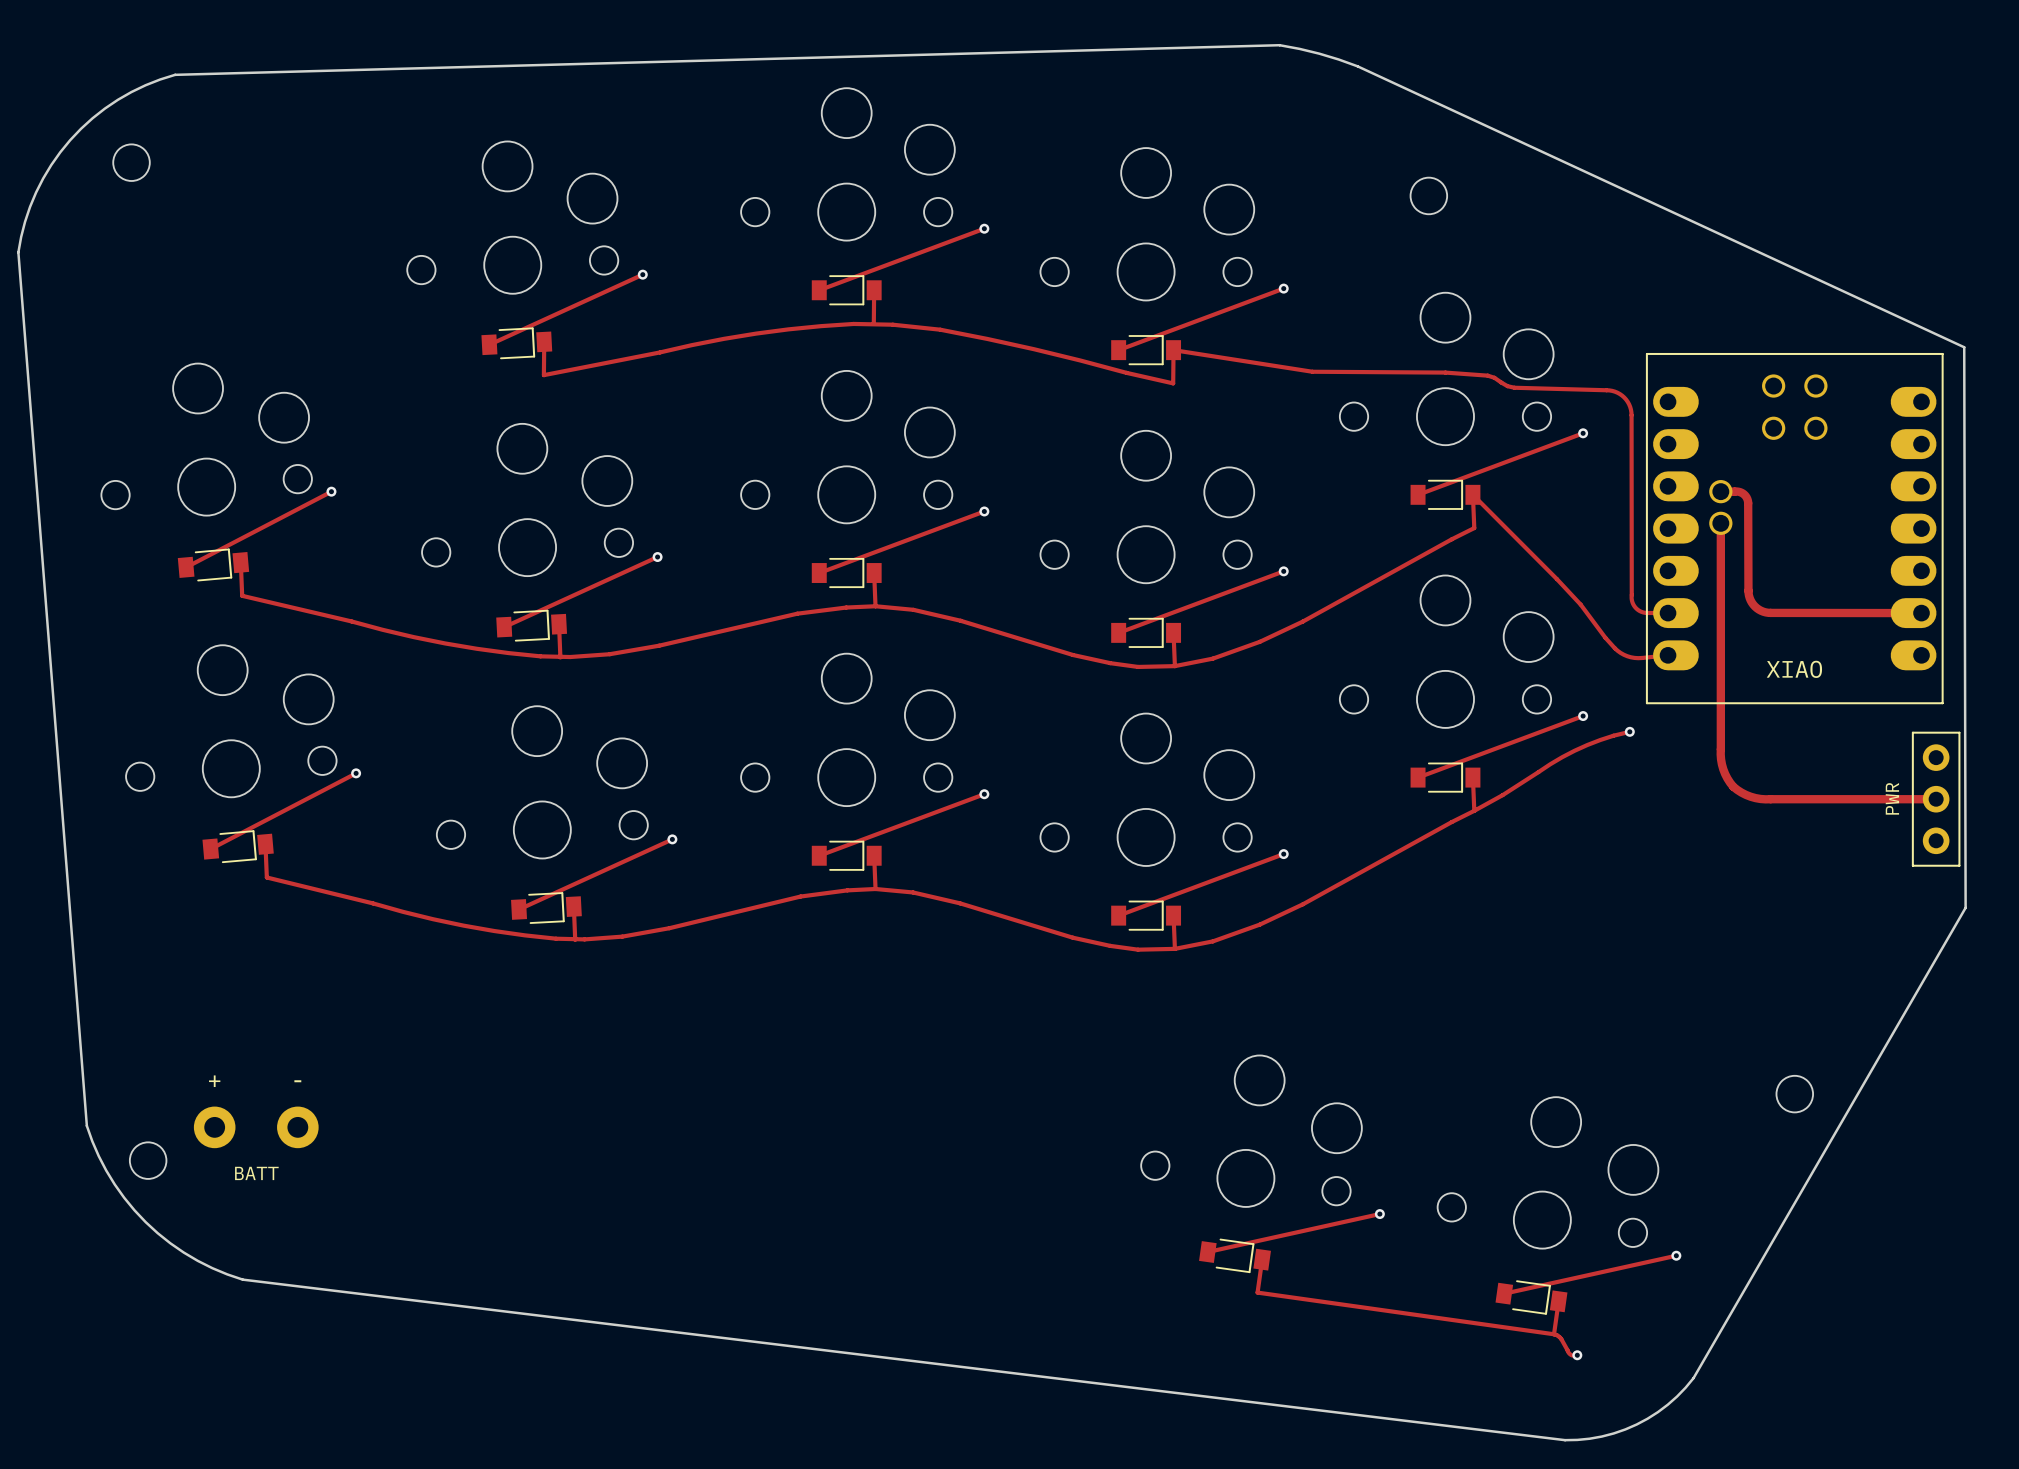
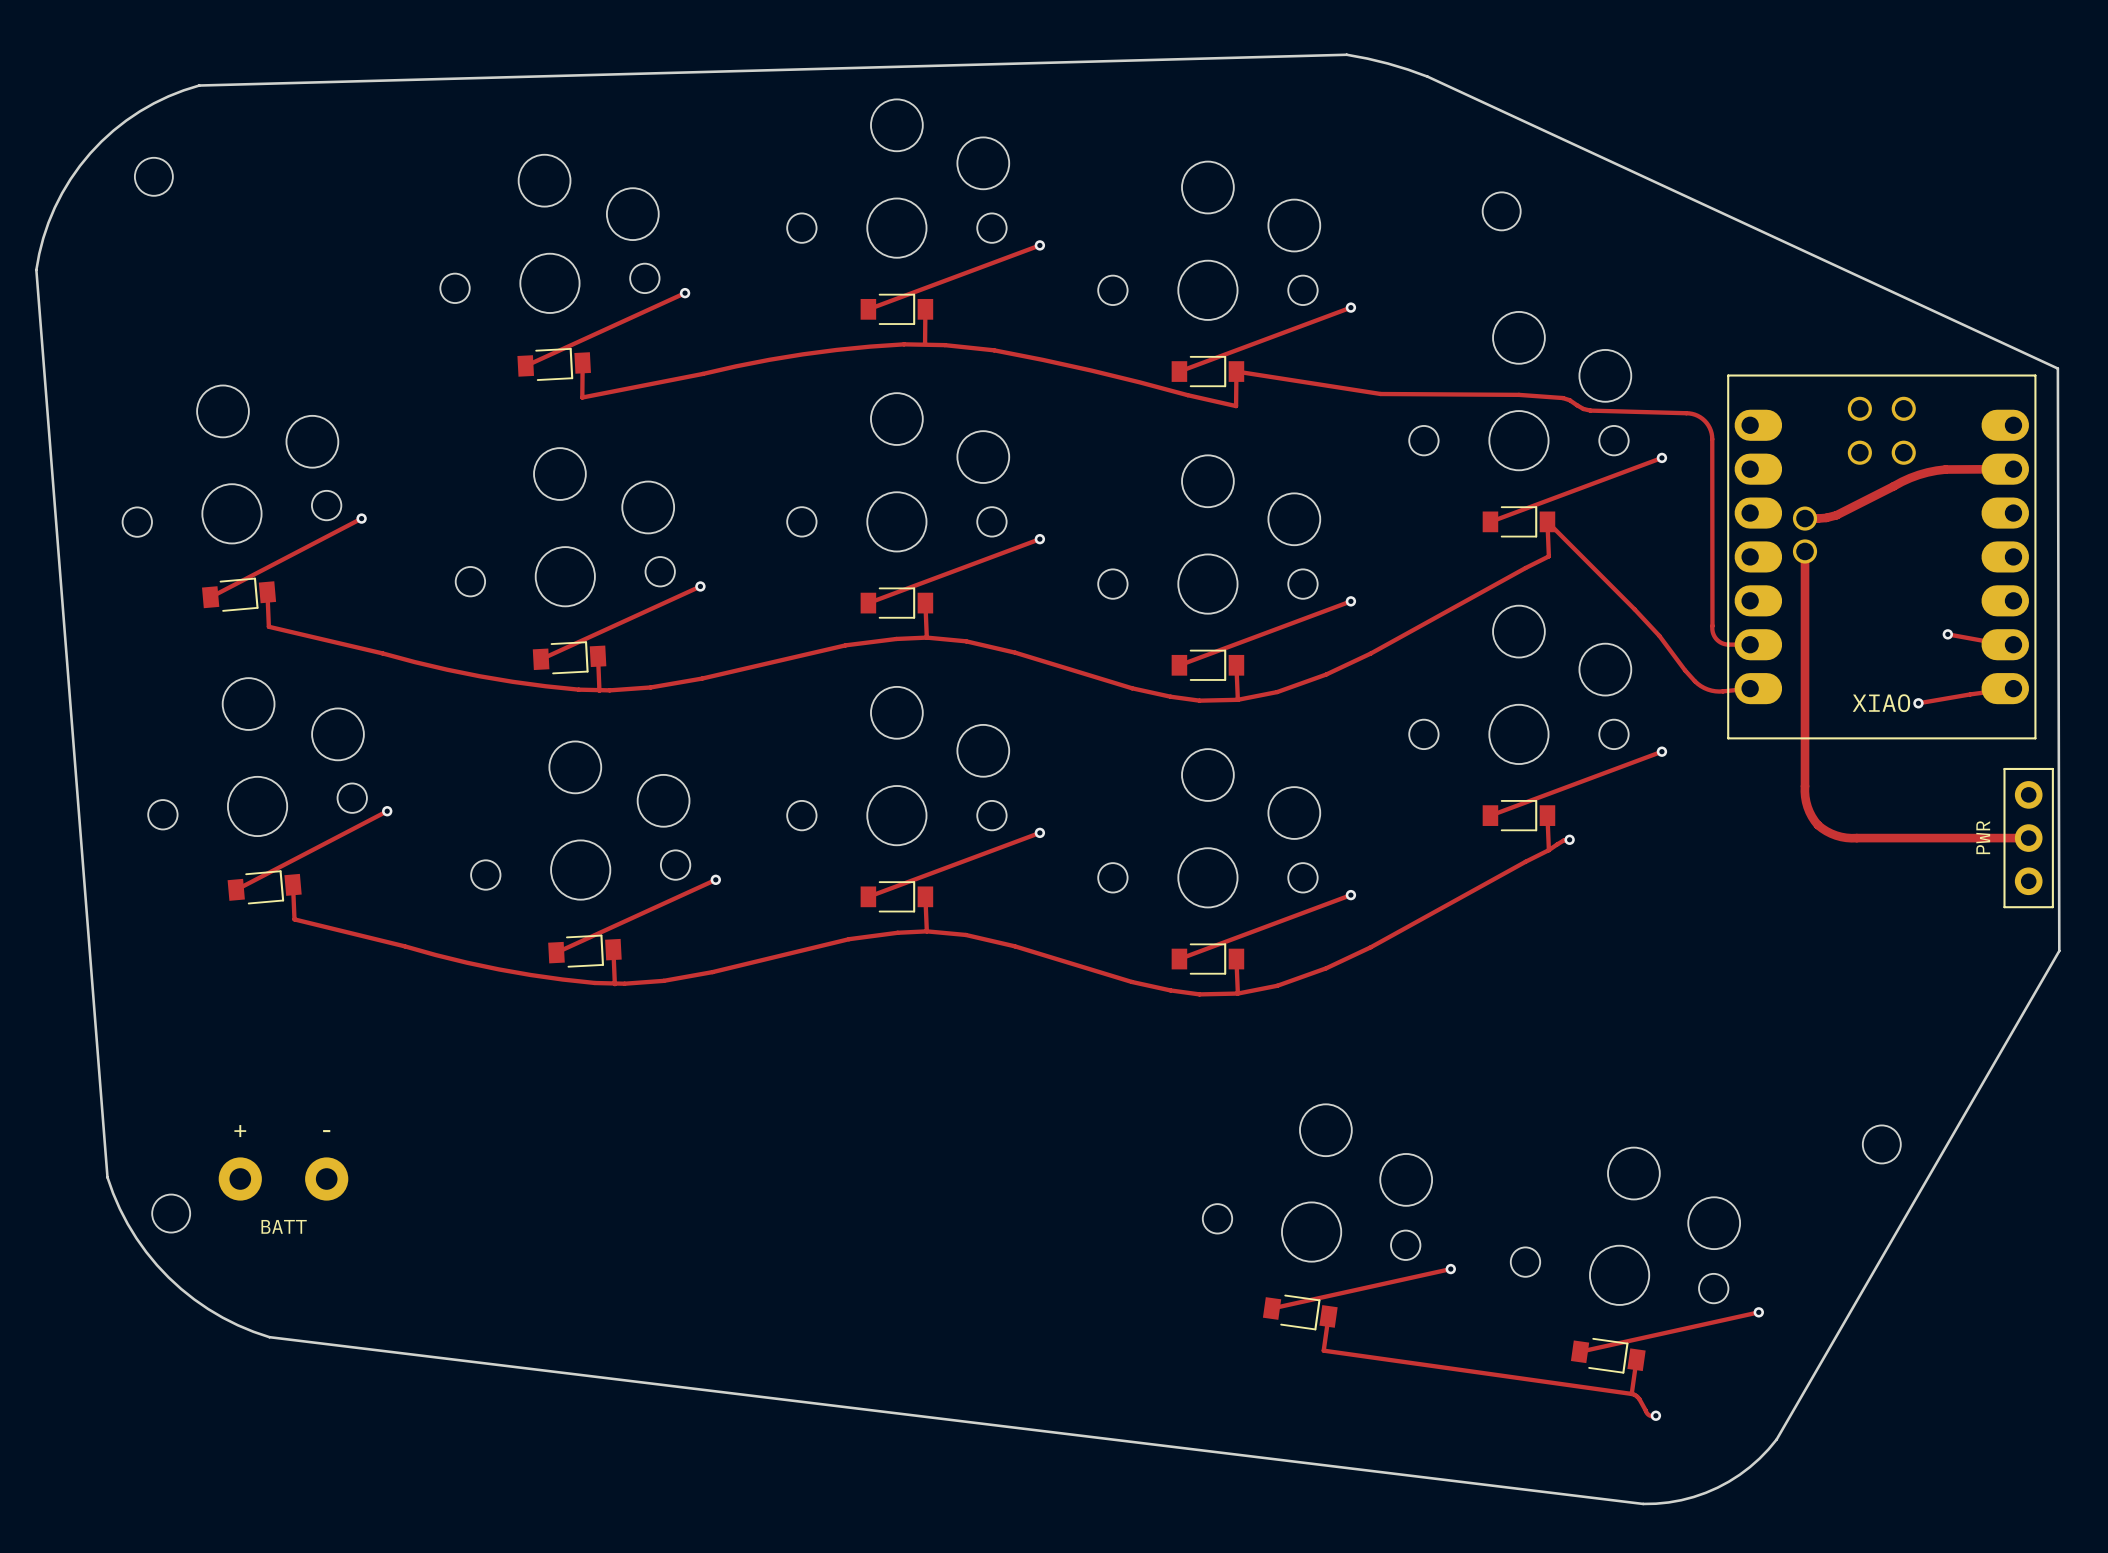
track: none -> (2013, 469) (1945, 469) (1927, 472) (1901, 481) (1836, 515) (1817, 518)
track: (1733, 491) (1742, 493) (1747, 500) (1748, 593) (1751, 602) (1758, 609) (1770, 612) (1921, 613) -> (1947, 634) (2013, 644)
via: none -> (1947, 634)
track: none -> (2013, 688) (1918, 703)
via: none -> (1918, 703)
track: (1629, 731) (1600, 740) (1574, 750) (1474, 810) -> (1569, 839) (1563, 840) (1548, 850)
via: (1629, 731) -> none
via: none -> (1569, 839)

